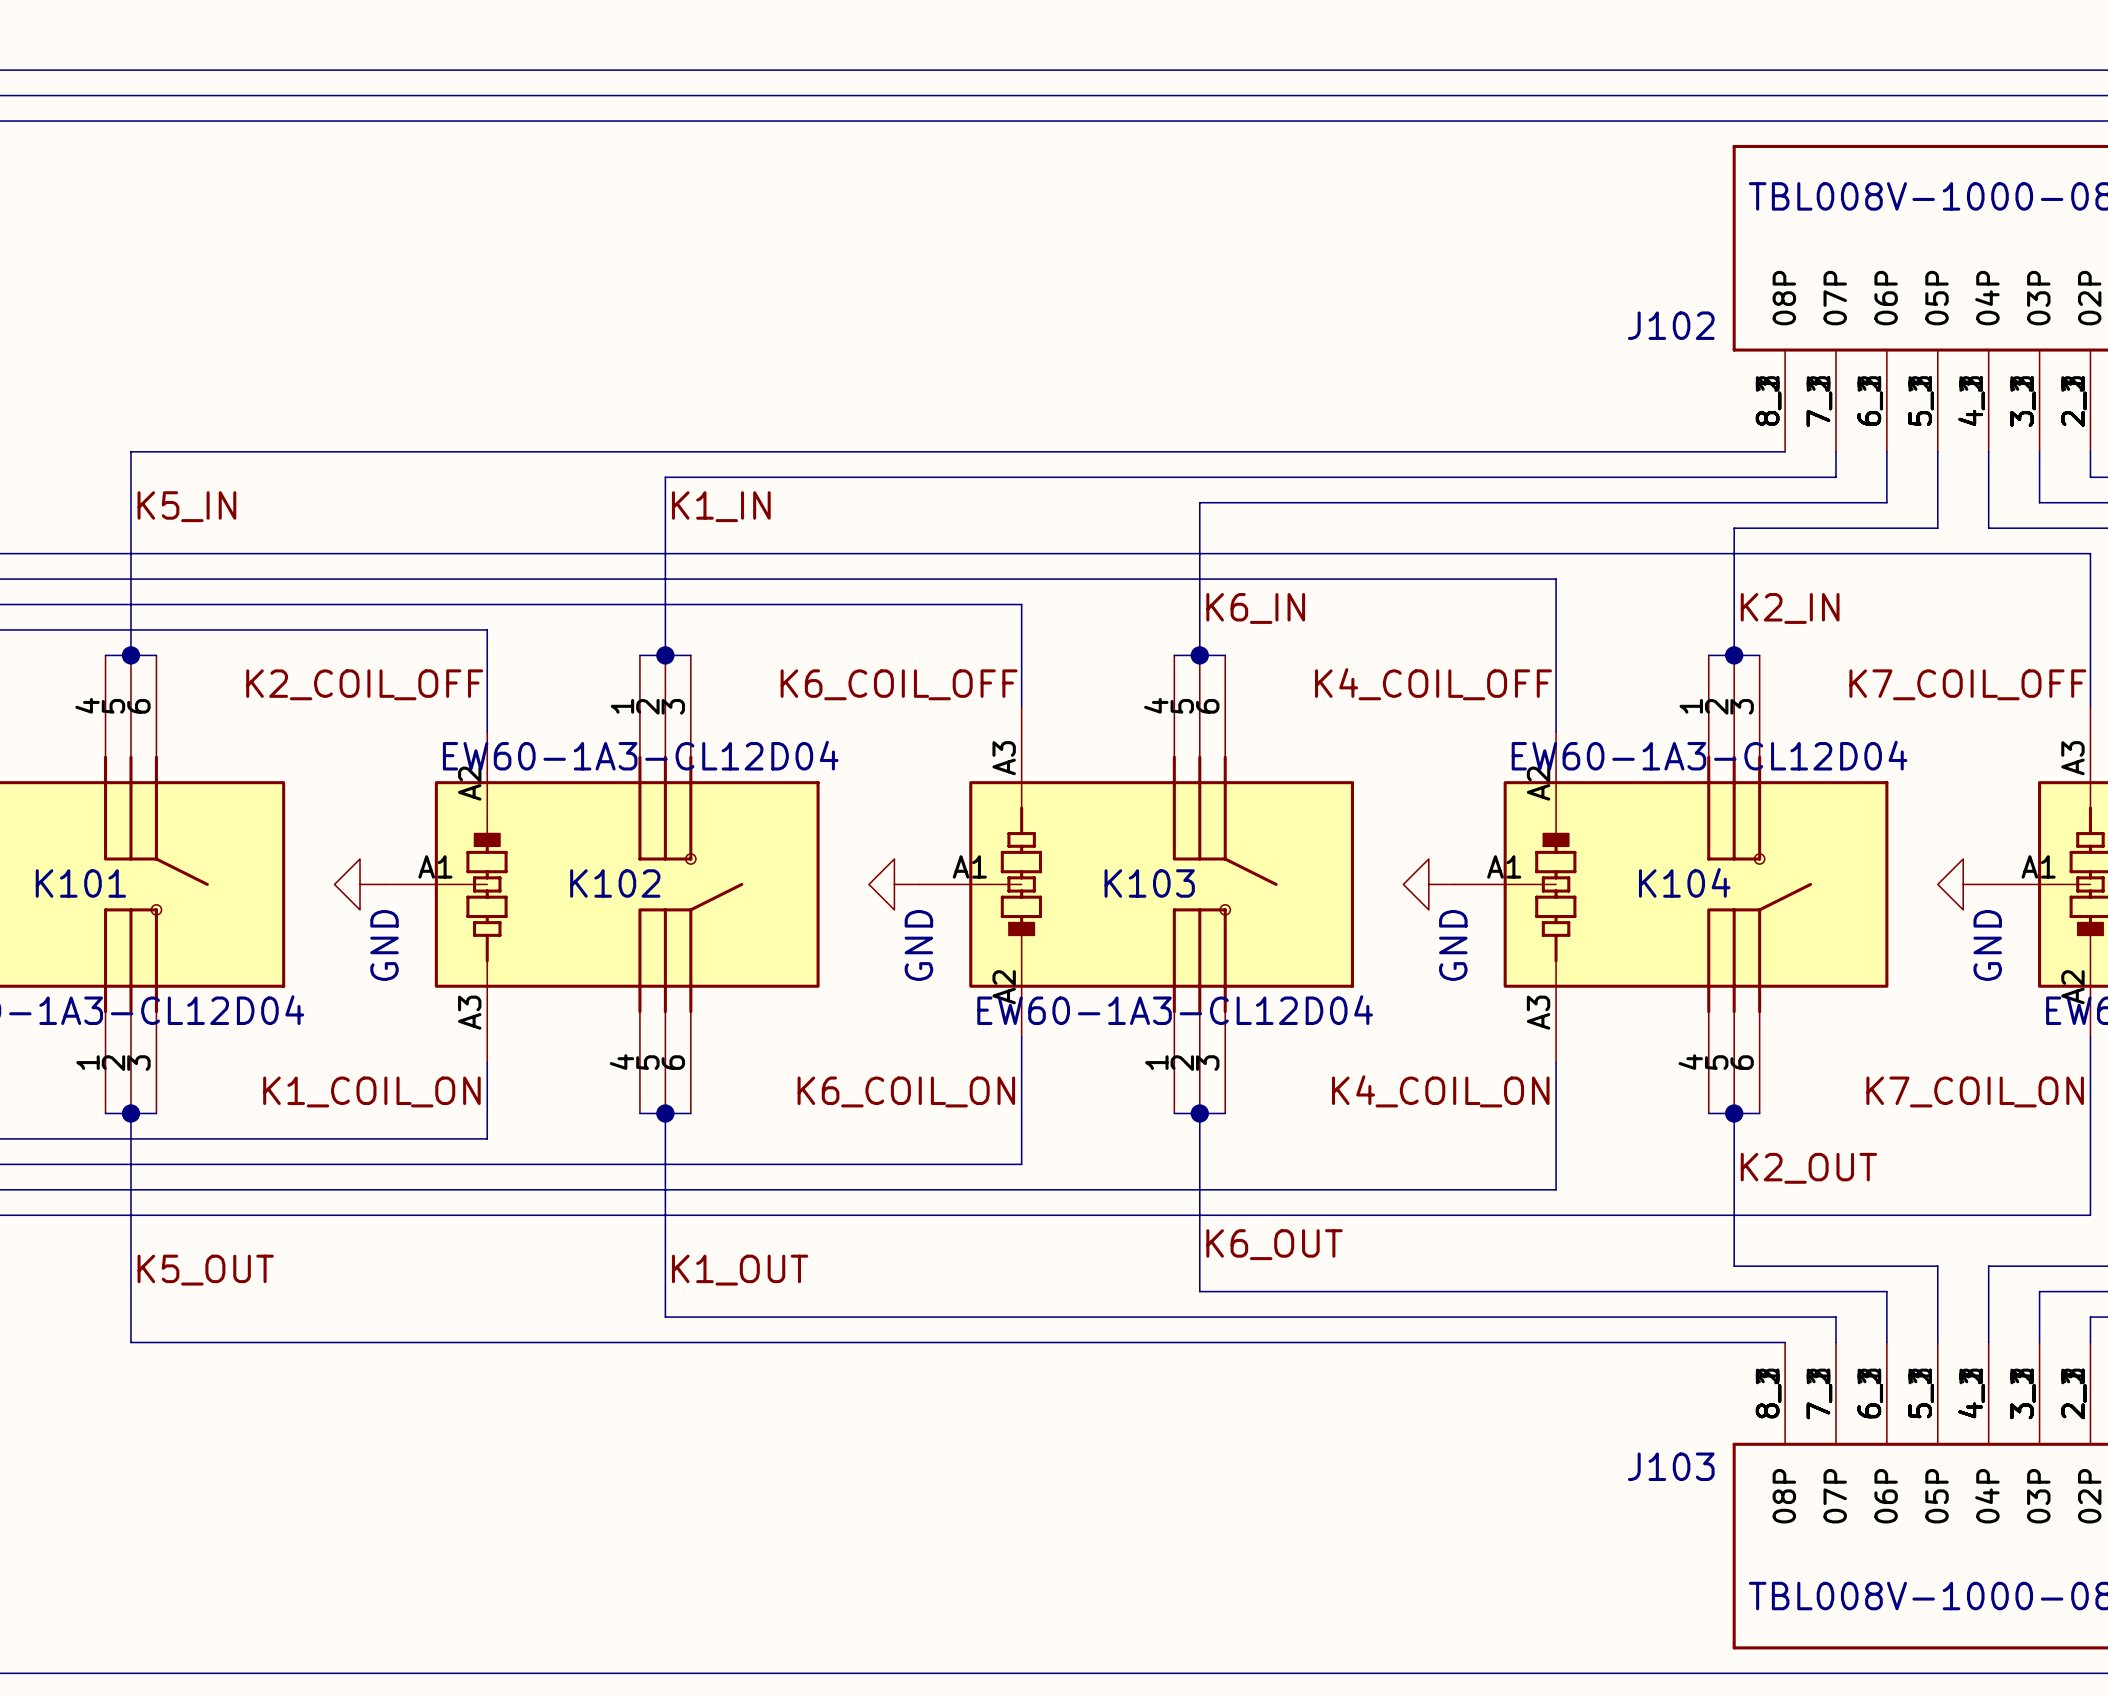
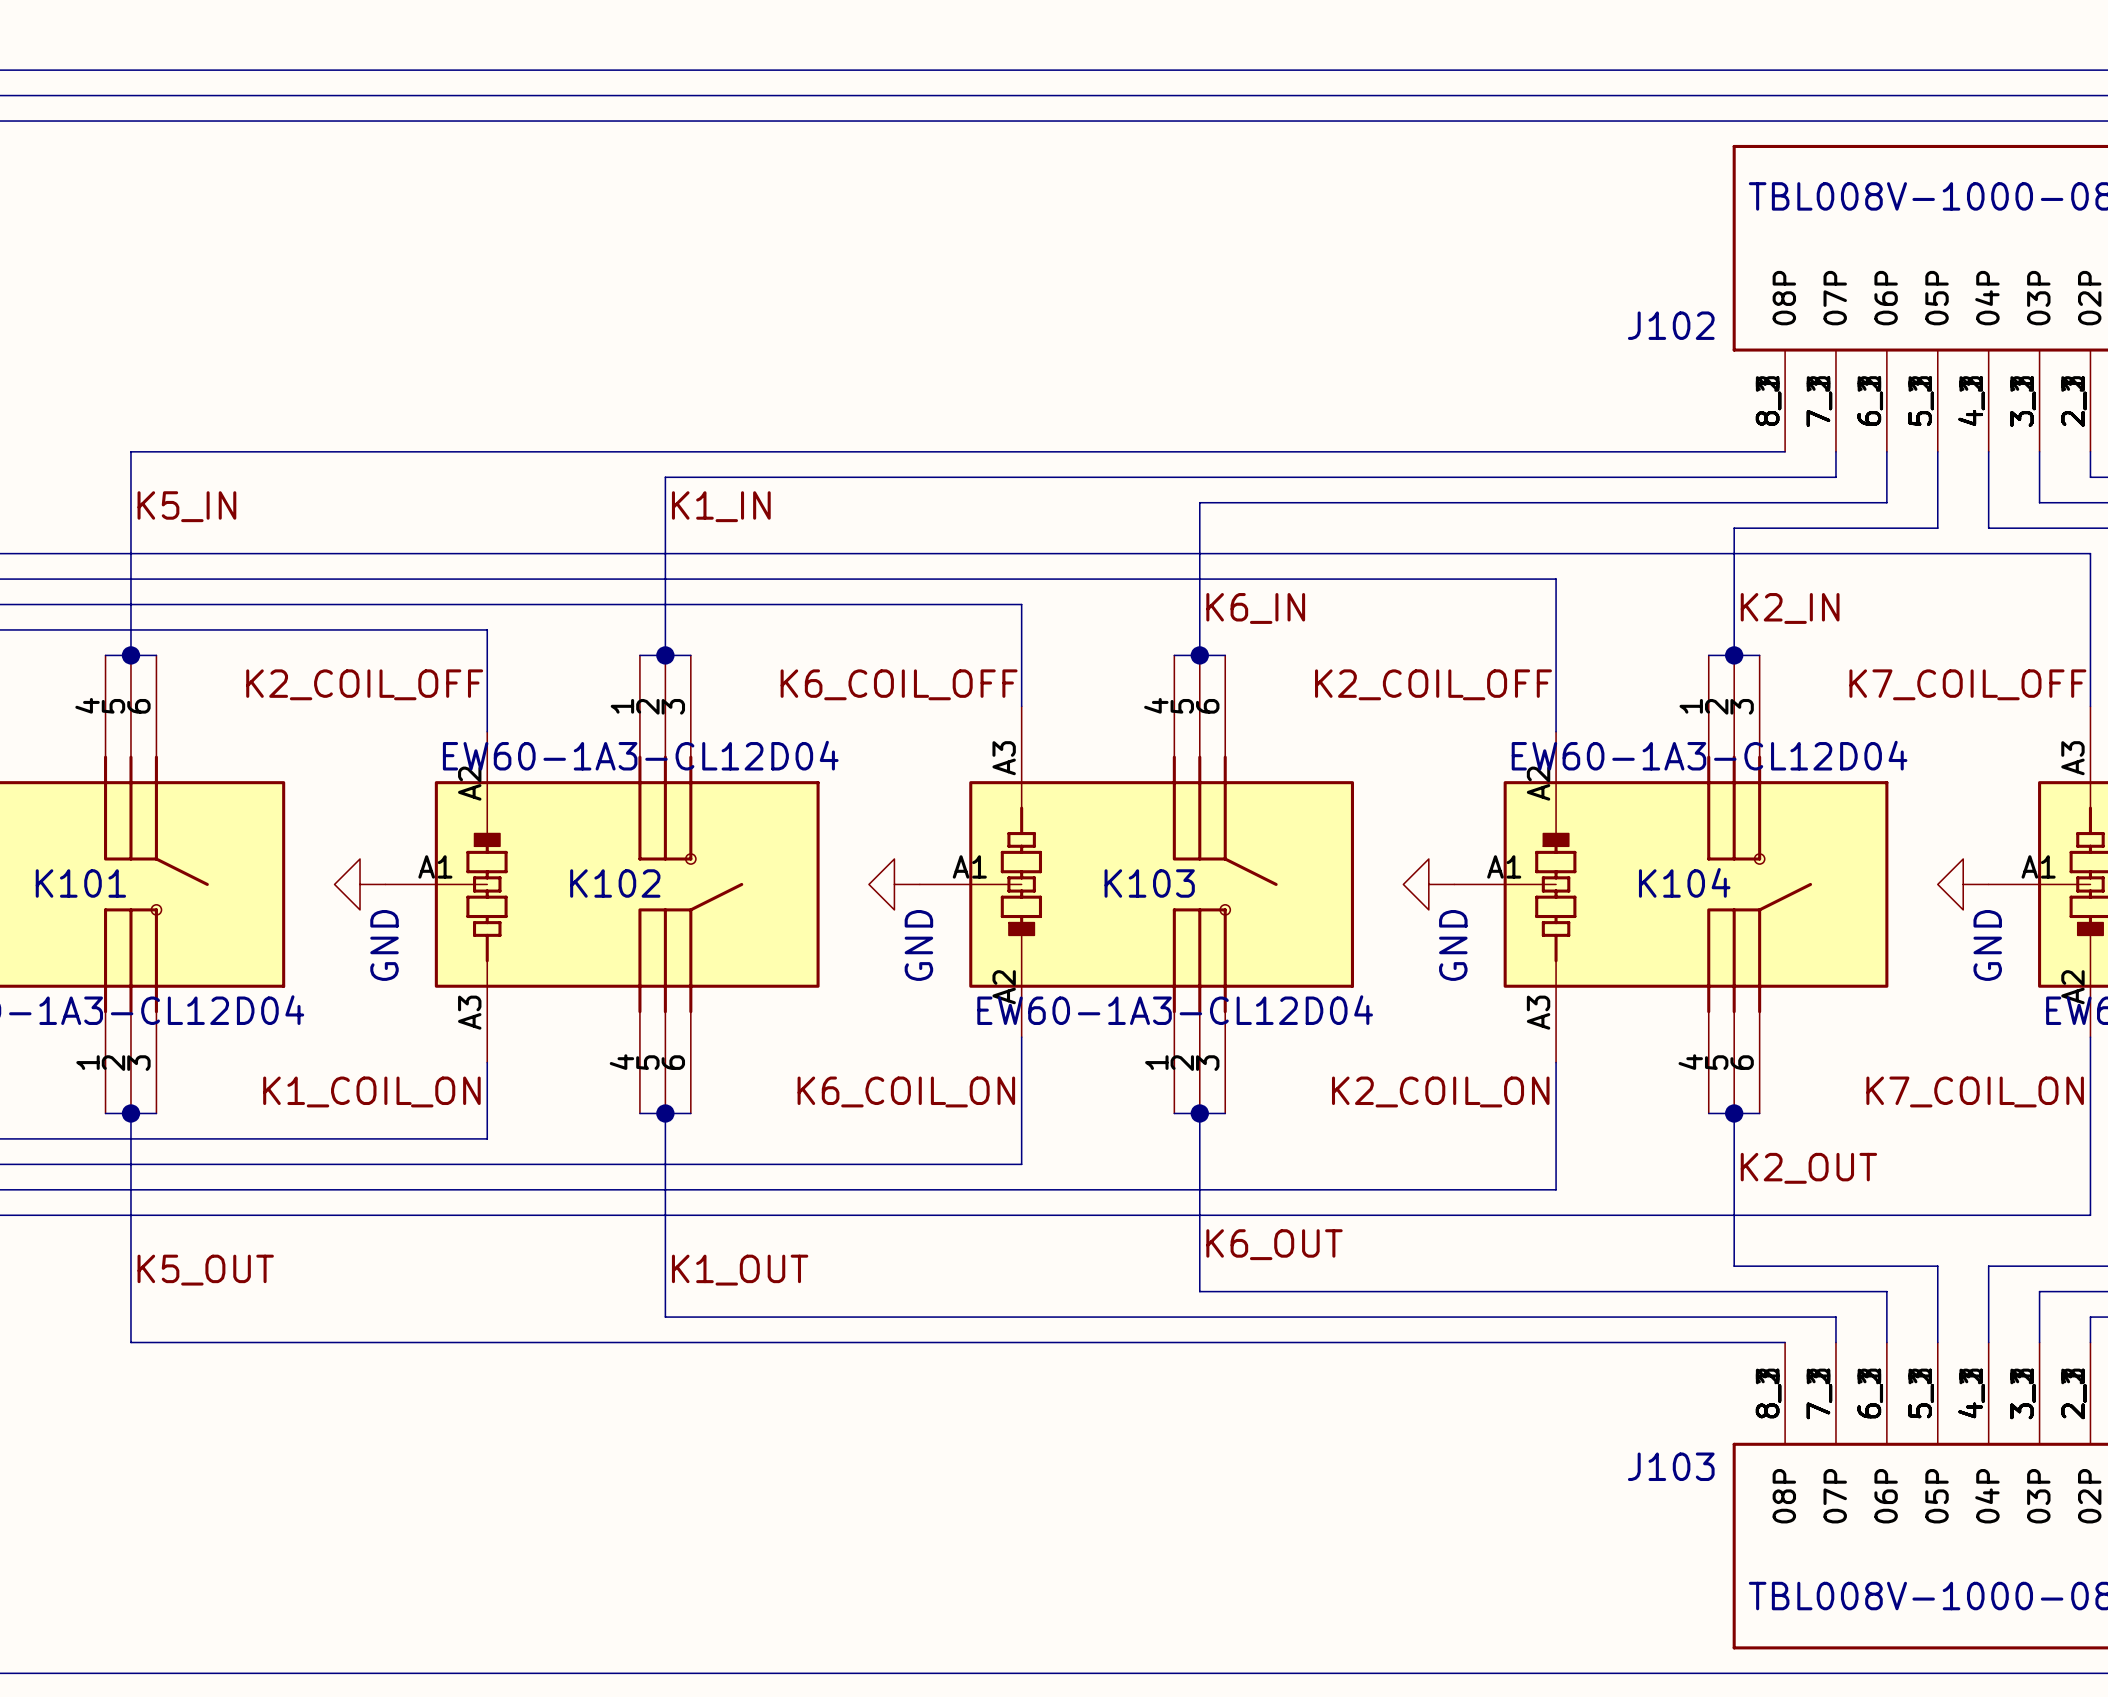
label: K4_COIL_OFF (1433, 684) -> K2_COIL_OFF (1433, 684)
label: K4_COIL_ON (1440, 1091) -> K2_COIL_ON (1440, 1091)

